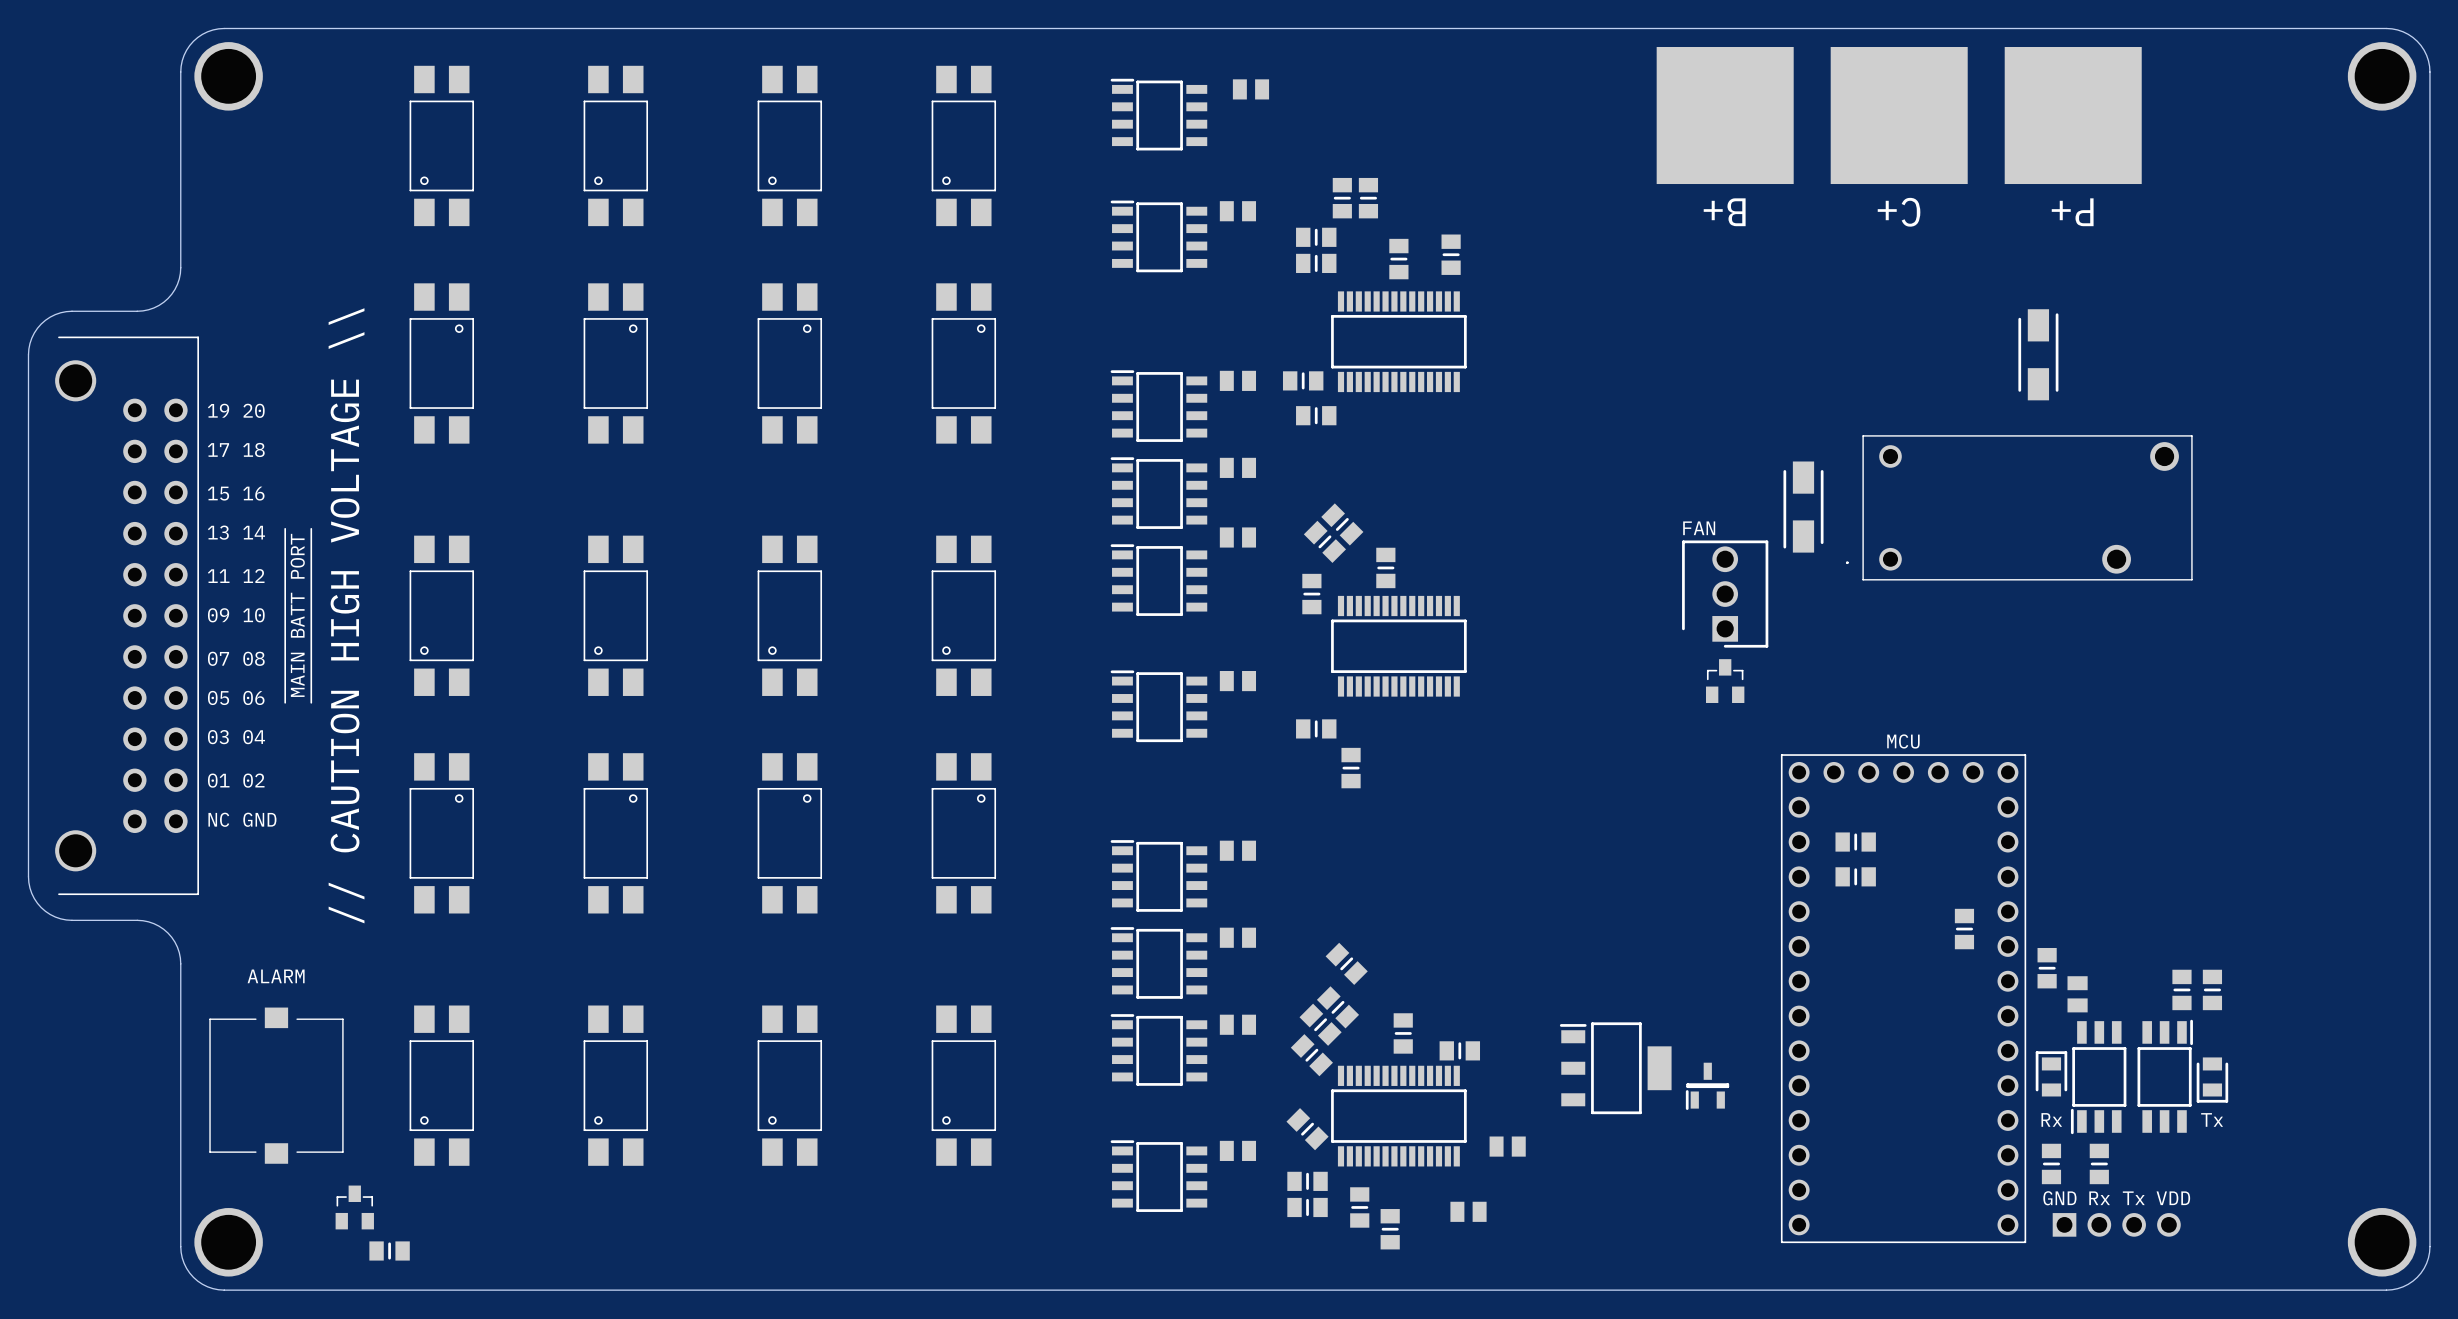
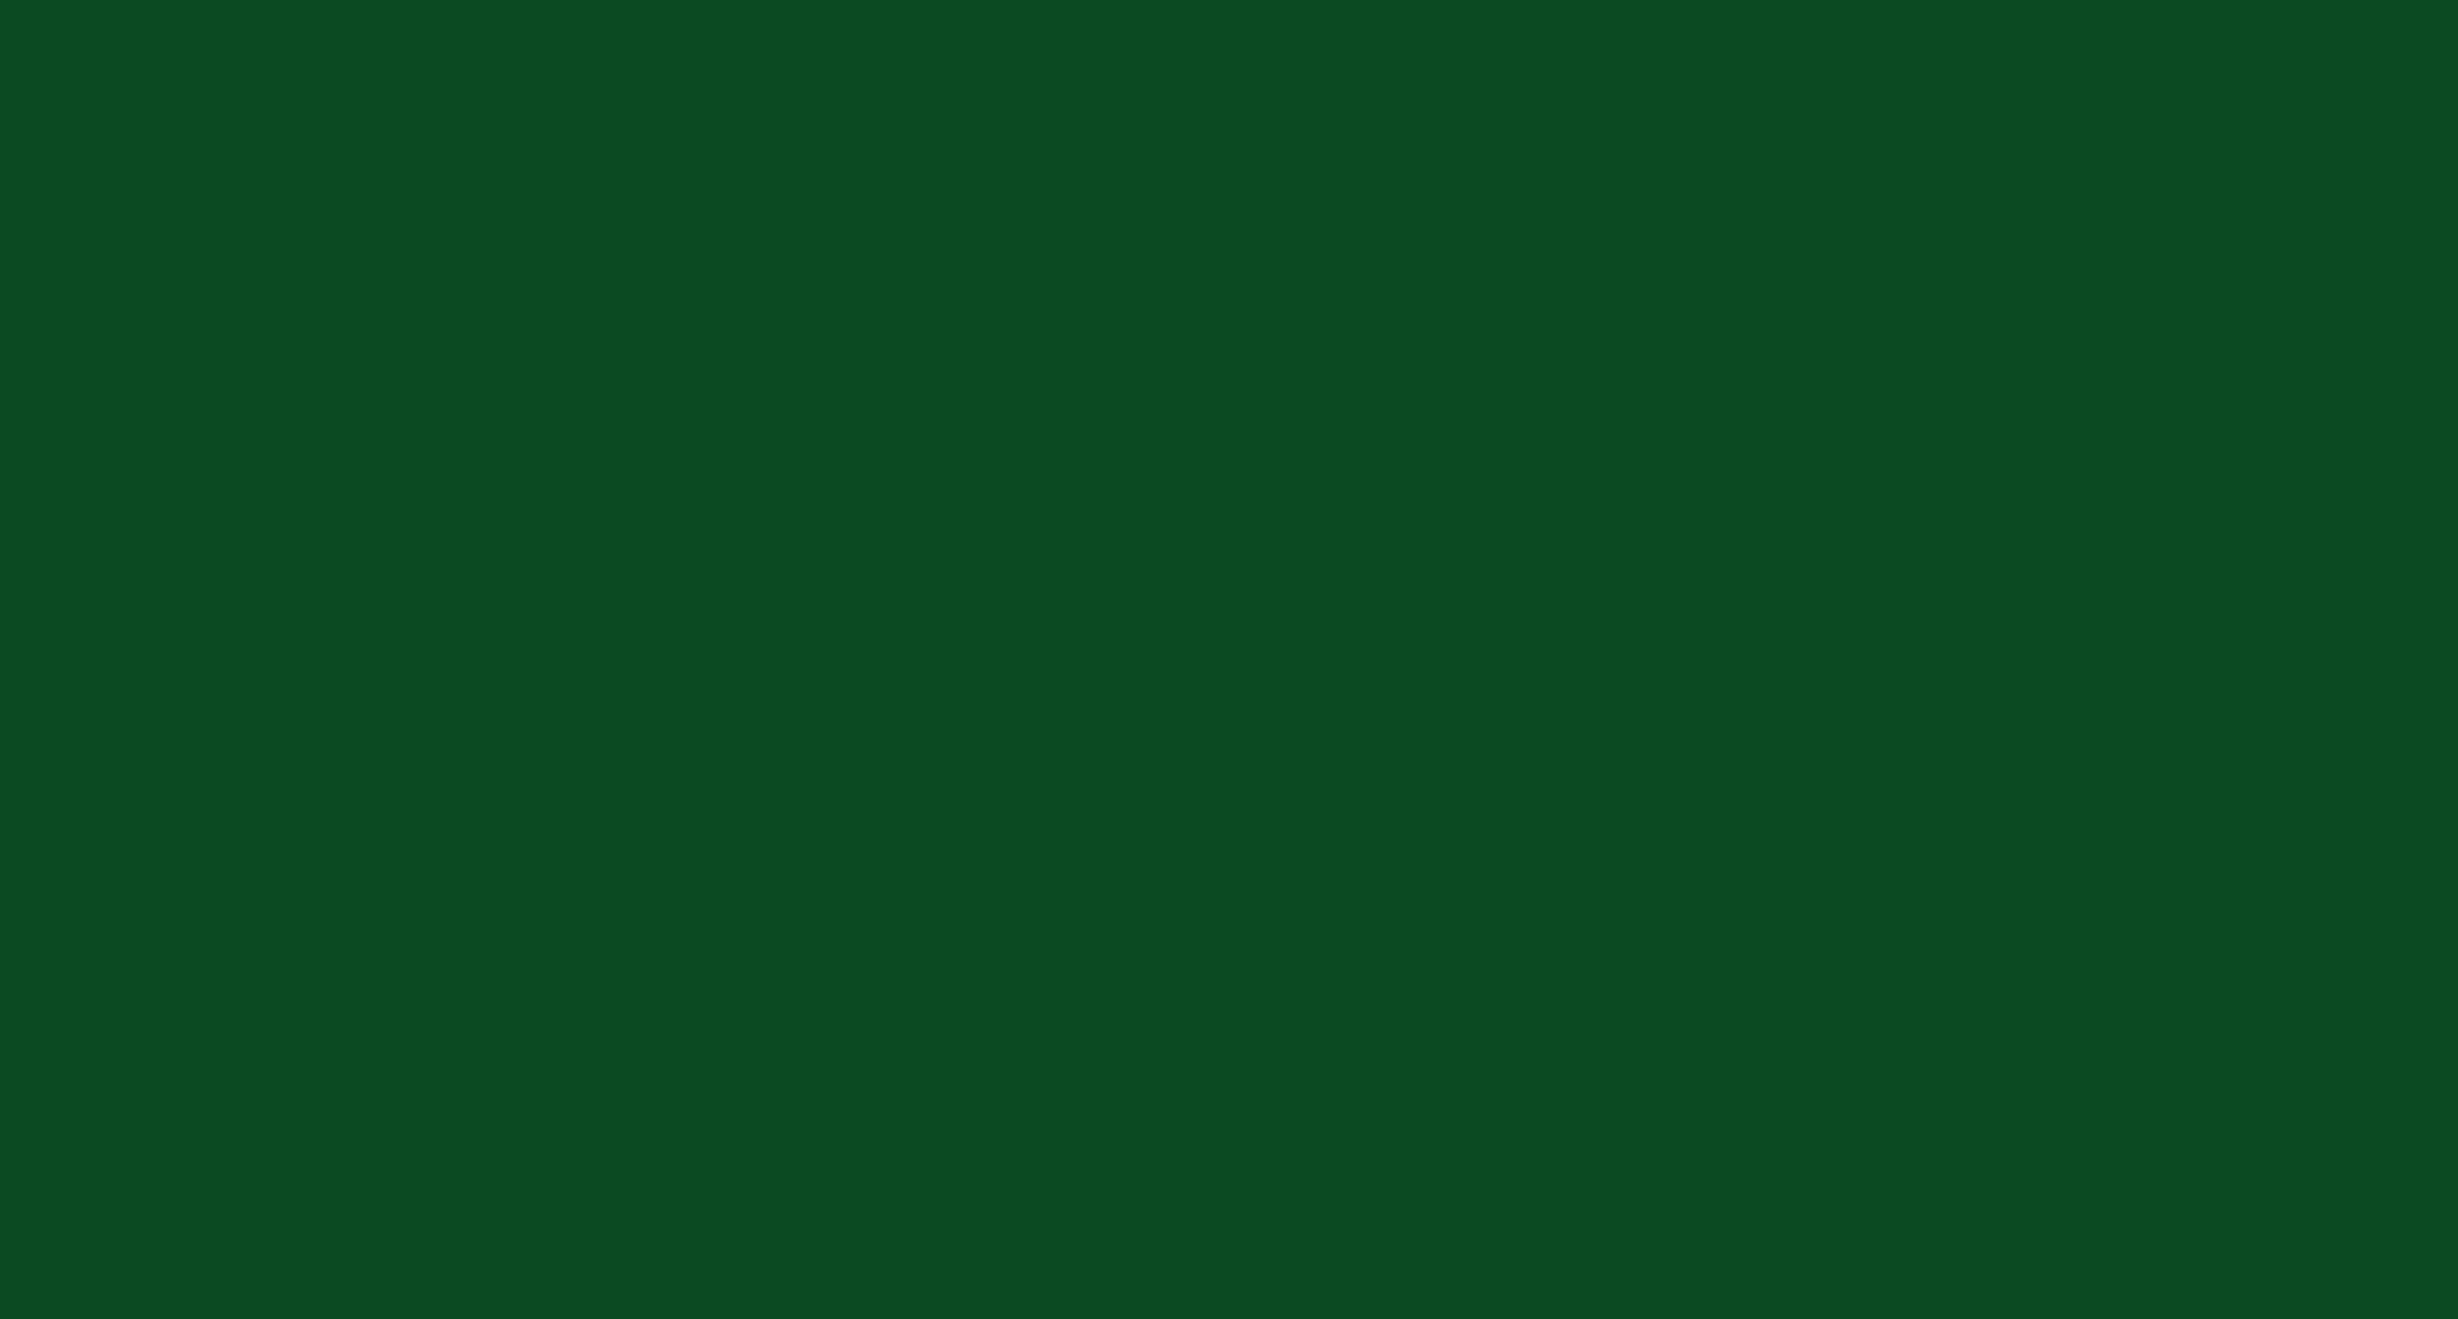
board edge: (224, 28) (2386, 28) (2408, 34) (2424, 50) (2429, 72) (2429, 1246) (2424, 1268) (2408, 1284) (2386, 1290) (224, 1290) (202, 1284) (189, 1273) (181, 1252) (180, 963) (177, 947) (168, 933) (148, 921) (72, 920) (55, 917) (37, 903) (28, 882) (28, 354) (31, 338) (37, 328) (55, 314) (72, 311) (148, 309) (163, 302) (174, 289) (180, 267) (181, 66) (184, 55) (193, 41) (207, 31) (224, 28) -> none
part: (228, 76) -> none
part: (2382, 76) -> none
part: (1250, 89) -> none
part: (1158, 114) -> none
part: (1725, 115) -> none
part: (1899, 115) -> none
part: (2073, 115) -> none
part: (441, 145) -> none
part: (615, 145) -> none
part: (789, 145) -> none
part: (963, 145) -> none
part: (1342, 198) -> none
part: (1368, 198) -> none
part: (1237, 211) -> none
text: B+ (1724, 212) -> none
text: C+ (1899, 212) -> none
text: P+ (2072, 212) -> none
part: (1158, 236) -> none
part: (1316, 237) -> none
part: (1451, 254) -> none
part: (1398, 259) -> none
part: (1316, 263) -> none
part: (1398, 341) -> none
part: (2038, 354) -> none
part: (441, 363) -> none
part: (615, 363) -> none
part: (789, 363) -> none
part: (963, 363) -> none
part: (1237, 380) -> none
part: (1303, 380) -> none
part: (1158, 406) -> none
text: 19 20 (236, 410) -> none
part: (1316, 415) -> none
text: 17 18 (236, 449) -> none
part: (1237, 467) -> none
text: 15 16 (236, 493) -> none
part: (1158, 493) -> none
part: (1803, 507) -> none
part: (2019, 507) -> none
part: (1342, 524) -> none
line: (285, 528) (285, 702) -> none
line: (311, 528) (311, 702) -> none
text: FAN (1699, 528) -> none
text: 13 14 (236, 532) -> none
part: (1237, 537) -> none
part: (1324, 541) -> none
part: (1385, 567) -> none
text: 11 12 (236, 576) -> none
part: (1158, 580) -> none
part: (1311, 594) -> none
part: (1725, 594) -> none
part: (127, 615) -> none
text: 09 10 (236, 615) -> none
text: MAIN BATT PORT (297, 615) -> none
text: // CAUTION HIGH VOLTAGE \\ (346, 615) -> none
part: (441, 615) -> none
part: (615, 615) -> none
part: (789, 615) -> none
part: (963, 615) -> none
part: (1398, 646) -> none
text: 07 08 (236, 658) -> none
part: (1237, 681) -> none
part: (1725, 681) -> none
text: 05 06 (236, 697) -> none
part: (1158, 706) -> none
part: (1316, 728) -> none
text: 03 04 (236, 737) -> none
text: MCU (1903, 741) -> none
part: (1351, 768) -> none
text: 01 02 (236, 780) -> none
text: NC GND (242, 819) -> none
part: (441, 833) -> none
part: (615, 833) -> none
part: (789, 833) -> none
part: (963, 833) -> none
part: (1855, 842) -> none
part: (1237, 850) -> none
part: (1158, 875) -> none
part: (1855, 876) -> none
part: (1964, 929) -> none
part: (1237, 937) -> none
part: (1158, 962) -> none
part: (1346, 963) -> none
part: (2047, 968) -> none
text: ALARM (276, 976) -> none
part: (2181, 989) -> none
part: (2212, 989) -> none
part: (2077, 994) -> none
part: (1903, 998) -> none
part: (1337, 1007) -> none
part: (1237, 1024) -> none
part: (1320, 1024) -> none
part: (1403, 1033) -> none
part: (1158, 1049) -> none
part: (1459, 1050) -> none
part: (1311, 1055) -> none
part: (1615, 1068) -> none
part: (2051, 1073) -> none
part: (2165, 1076) -> none
part: (2098, 1077) -> none
part: (2212, 1080) -> none
part: (276, 1085) -> none
part: (441, 1085) -> none
part: (615, 1085) -> none
part: (789, 1085) -> none
part: (963, 1085) -> none
part: (1707, 1086) -> none
part: (1398, 1116) -> none
text: Rx (2051, 1119) -> none
text: Tx (2212, 1119) -> none
part: (1307, 1129) -> none
part: (1507, 1146) -> none
part: (1237, 1150) -> none
part: (2051, 1163) -> none
part: (2099, 1163) -> none
part: (1158, 1176) -> none
part: (1307, 1181) -> none
text: GND (2059, 1198) -> none
text: Rx (2099, 1198) -> none
text: Tx (2133, 1198) -> none
text: VDD (2173, 1198) -> none
part: (354, 1207) -> none
part: (1307, 1207) -> none
part: (1359, 1207) -> none
part: (1468, 1211) -> none
part: (2116, 1224) -> none
part: (1390, 1229) -> none
part: (228, 1242) -> none
part: (2382, 1242) -> none
part: (389, 1250) -> none

